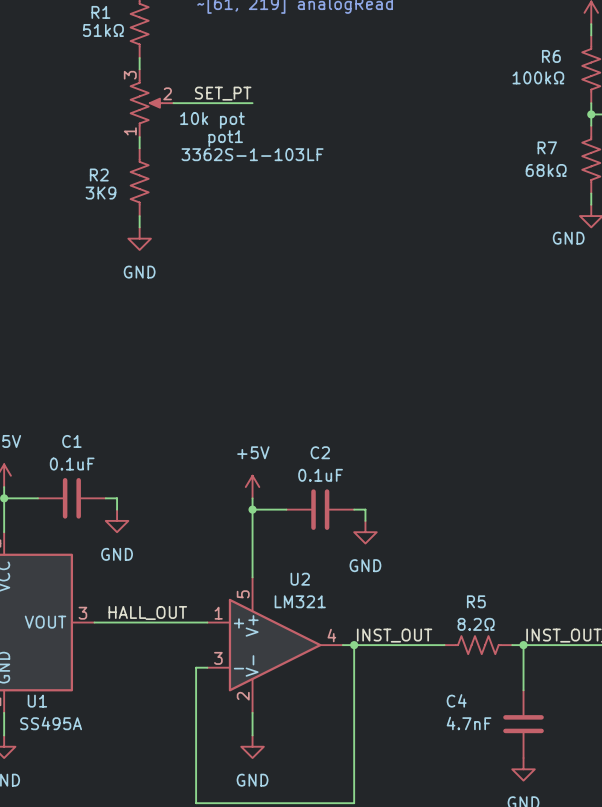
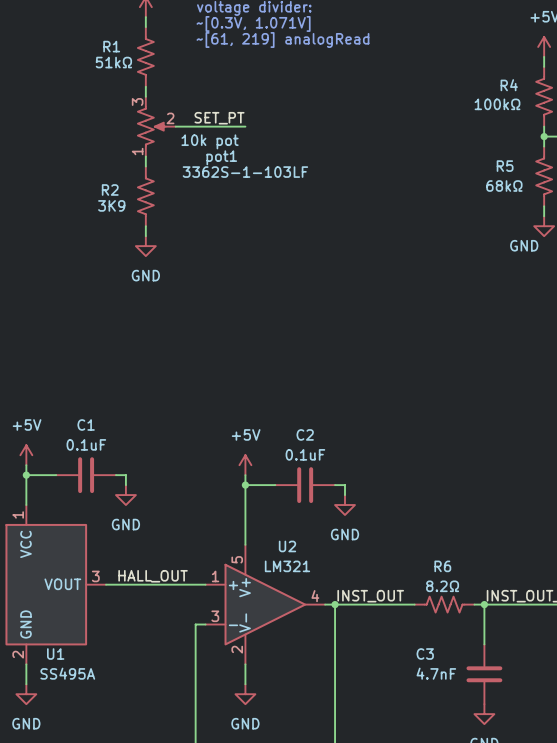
R6 name: R6 (551, 56) -> R4 (509, 85)
R7 name: R7 (547, 147) -> R5 (505, 166)
R5 name: R5 (476, 601) -> R6 (442, 566)
C4 name: C4 (456, 700) -> C3 (425, 654)

